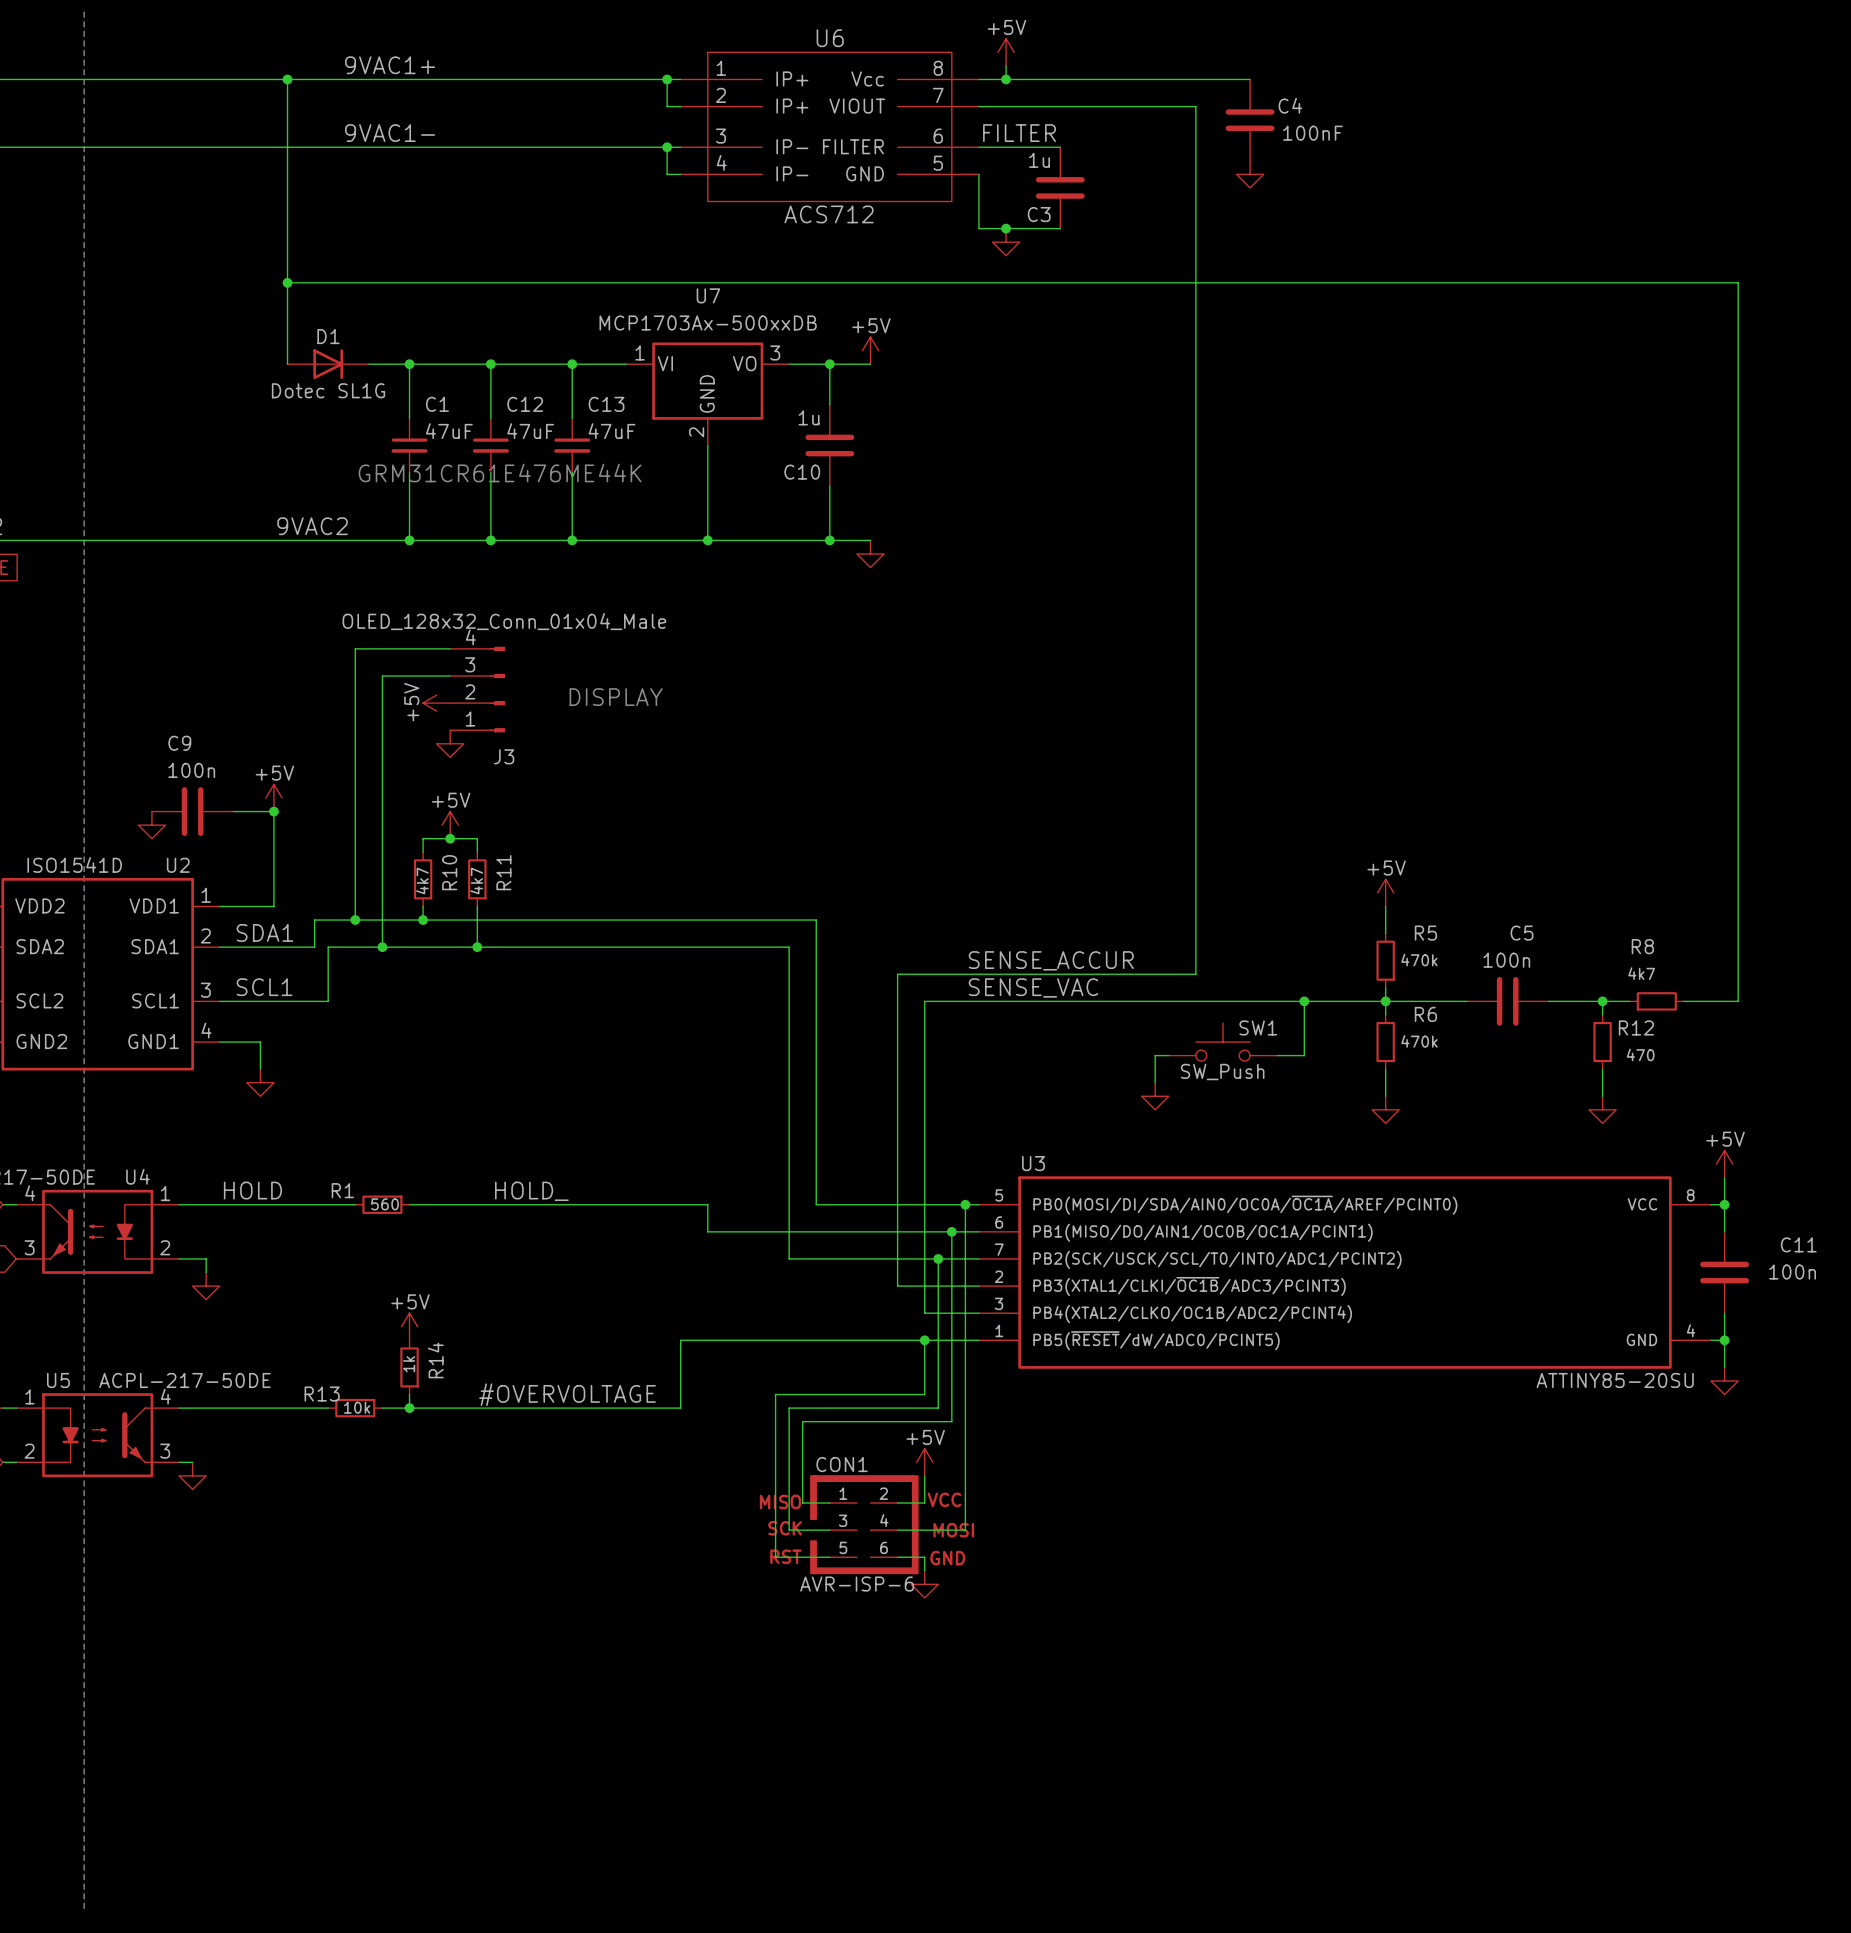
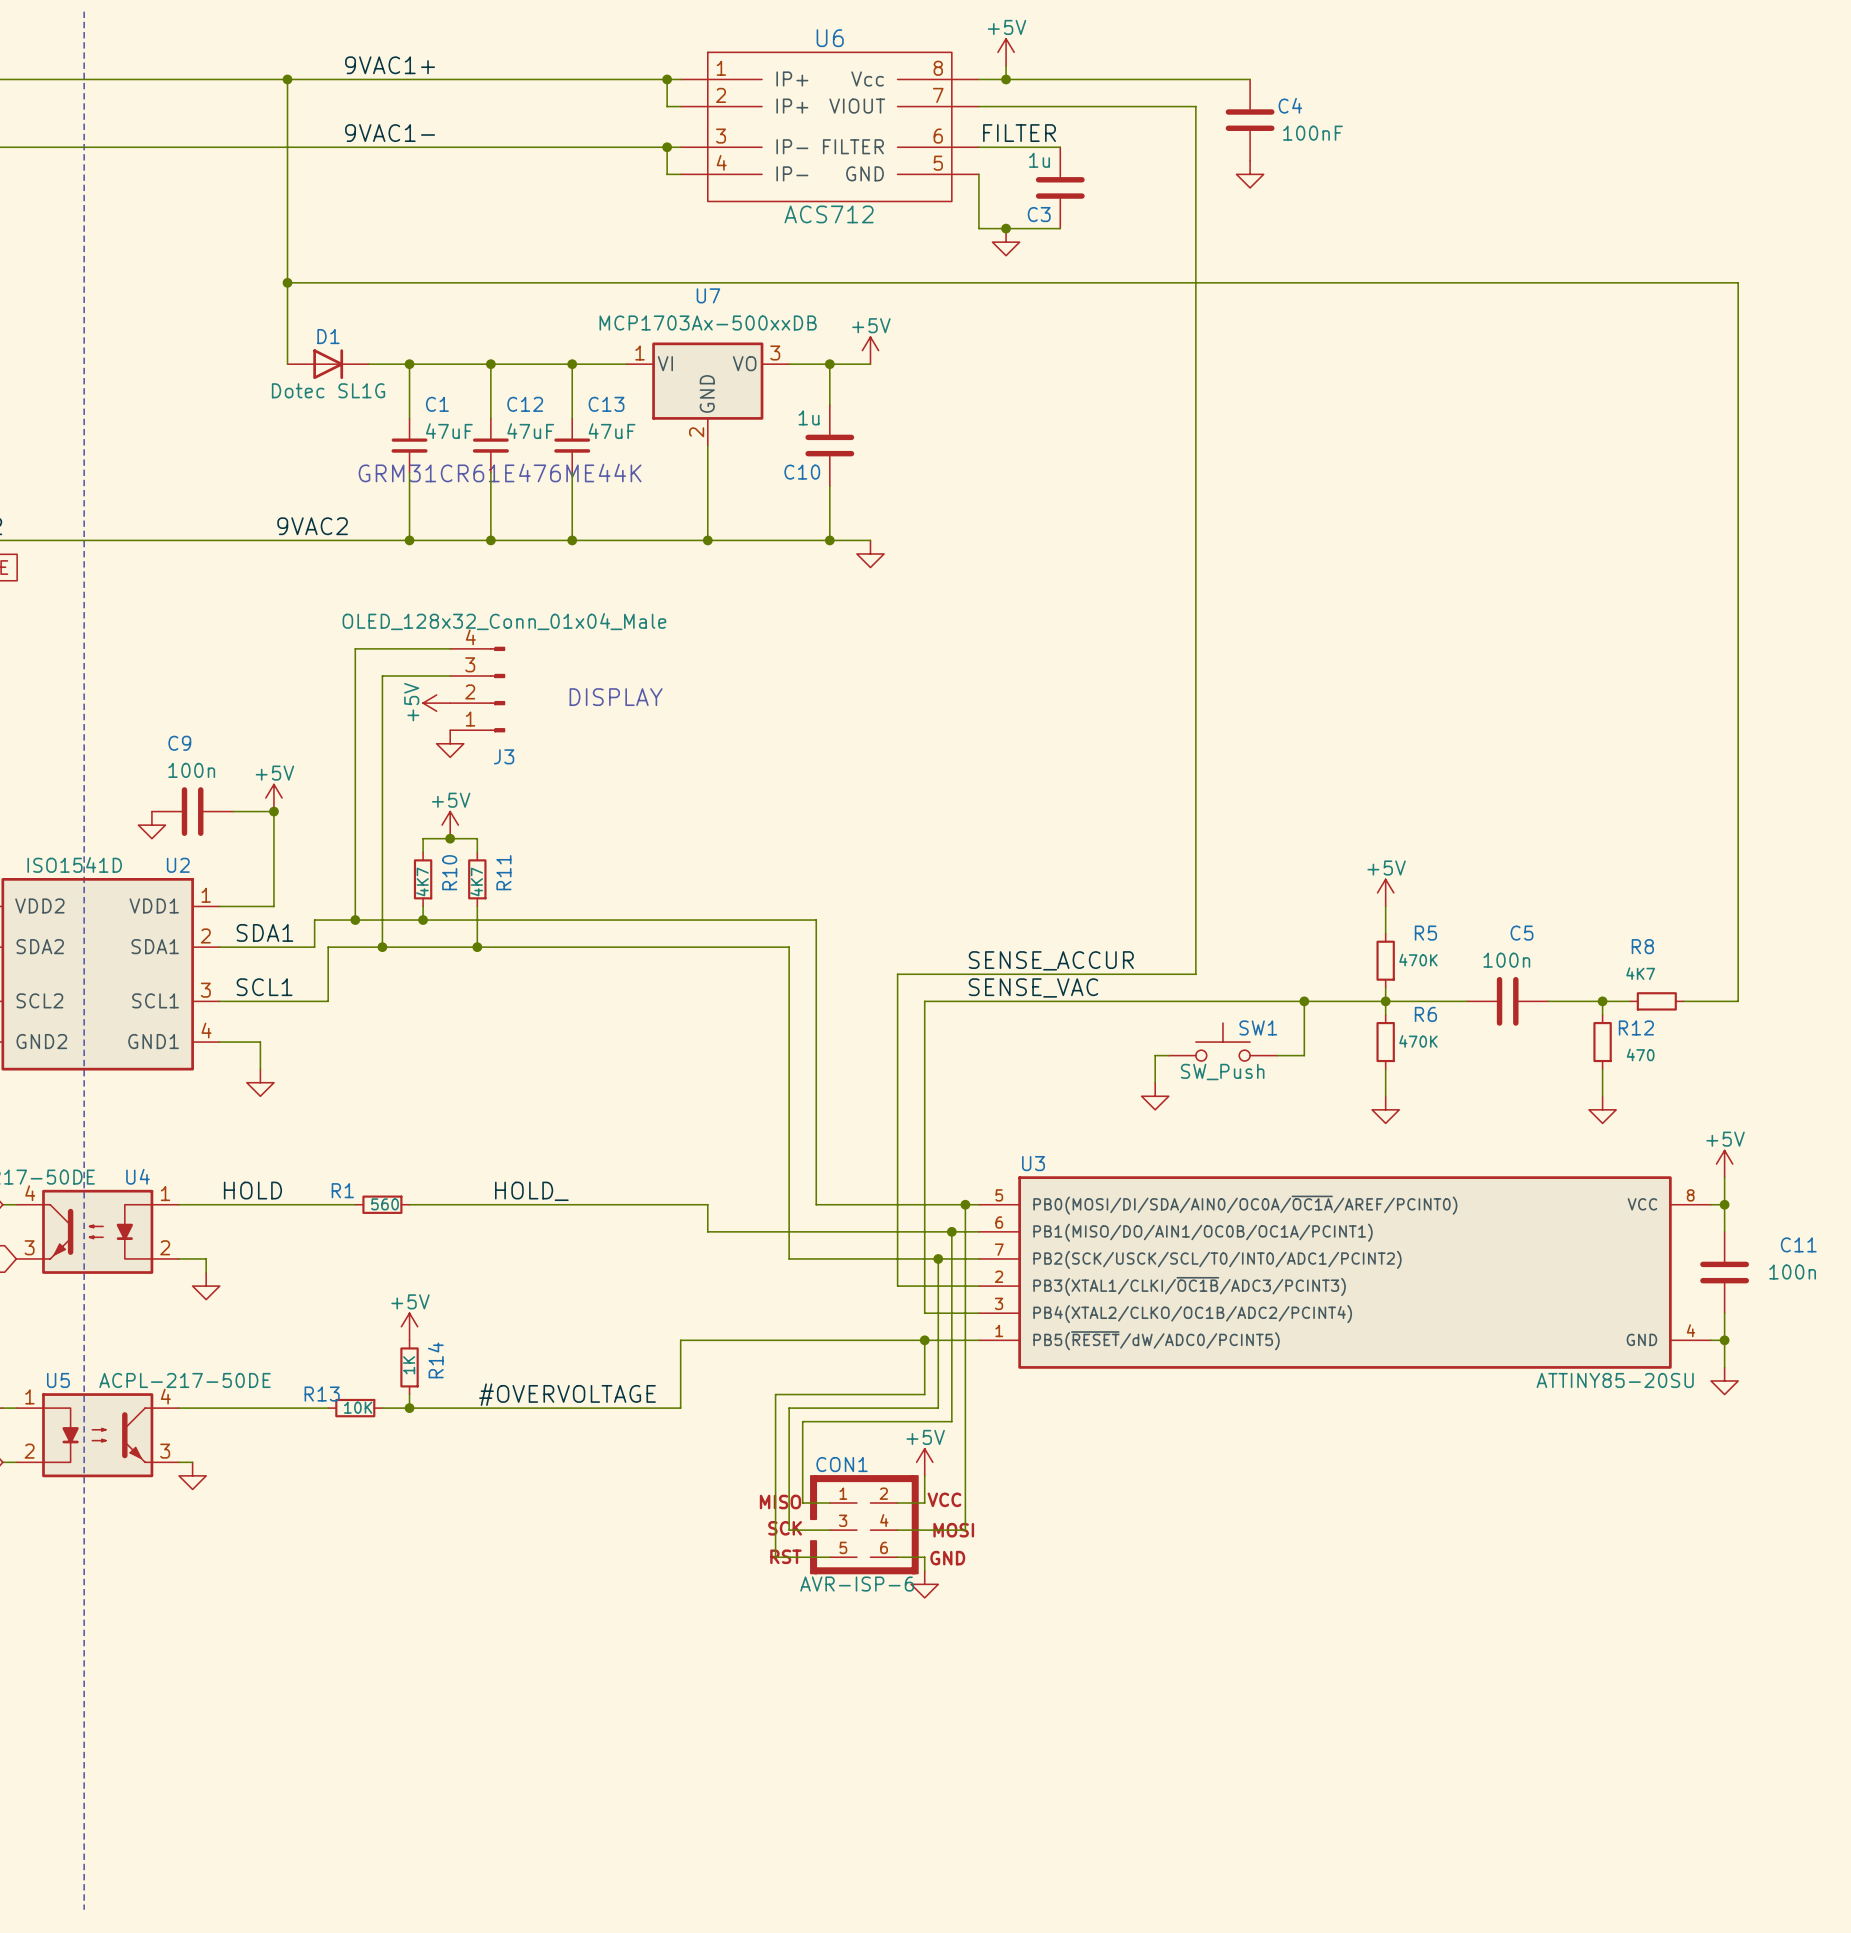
R10 value: 4k7 (422, 880) -> 4K7 (422, 881)
R11 value: 4k7 (476, 880) -> 4K7 (476, 881)
R5 value: 470k (1419, 960) -> 470K (1418, 960)
R8 value: 4k7 (1641, 973) -> 4K7 (1640, 973)
R6 value: 470k (1419, 1041) -> 470K (1418, 1041)
R14 value: 1k (409, 1364) -> 1K (409, 1365)
R13 value: 10k (357, 1407) -> 10K (358, 1407)

